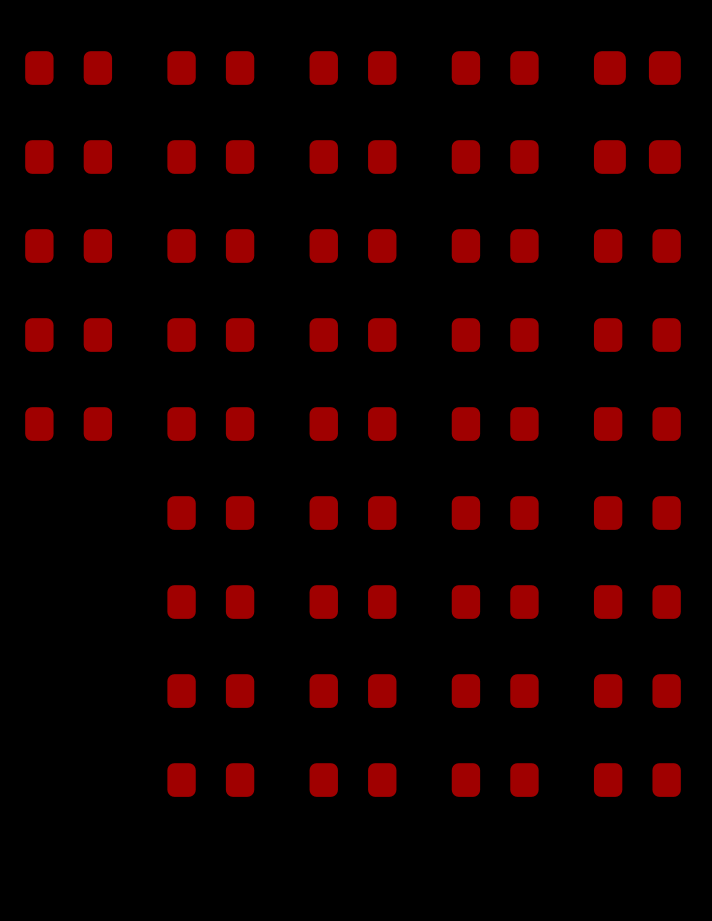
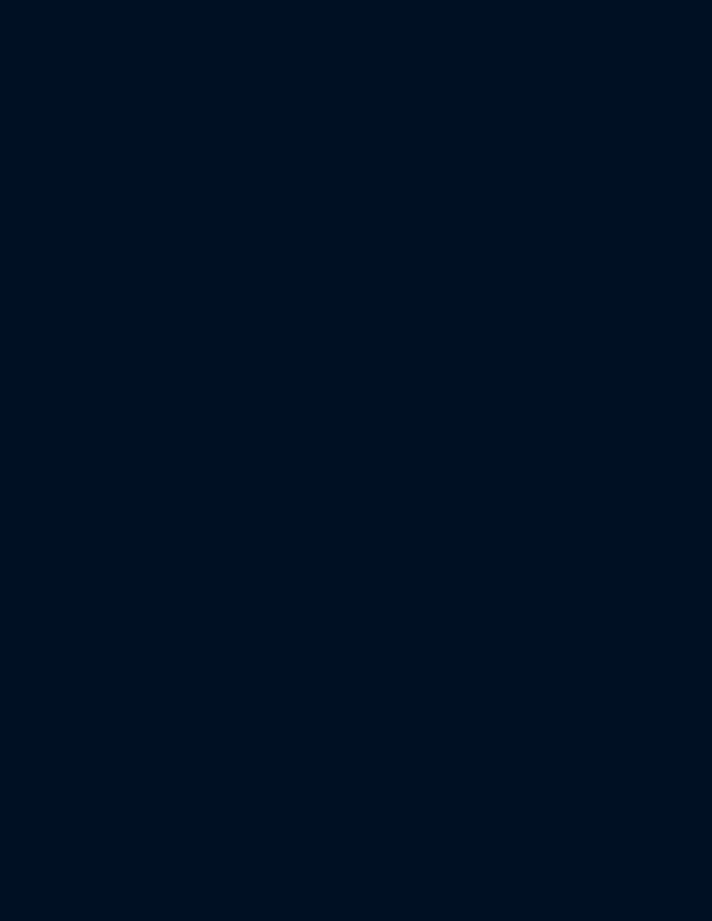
part: (68, 68) -> none
part: (210, 68) -> none
part: (353, 68) -> none
part: (495, 68) -> none
part: (637, 68) -> none
part: (68, 157) -> none
part: (210, 157) -> none
part: (353, 157) -> none
part: (495, 157) -> none
part: (637, 157) -> none
part: (68, 246) -> none
part: (210, 246) -> none
part: (353, 246) -> none
part: (495, 246) -> none
part: (637, 246) -> none
part: (68, 335) -> none
part: (210, 335) -> none
part: (353, 335) -> none
part: (495, 335) -> none
part: (637, 335) -> none
part: (68, 424) -> none
part: (210, 424) -> none
part: (353, 424) -> none
part: (495, 424) -> none
part: (637, 424) -> none
part: (210, 513) -> none
part: (353, 513) -> none
part: (495, 513) -> none
part: (637, 513) -> none
part: (210, 602) -> none
part: (353, 602) -> none
part: (495, 602) -> none
part: (637, 602) -> none
part: (210, 691) -> none
part: (353, 691) -> none
part: (495, 691) -> none
part: (637, 691) -> none
part: (210, 780) -> none
part: (353, 780) -> none
part: (495, 780) -> none
part: (637, 780) -> none

